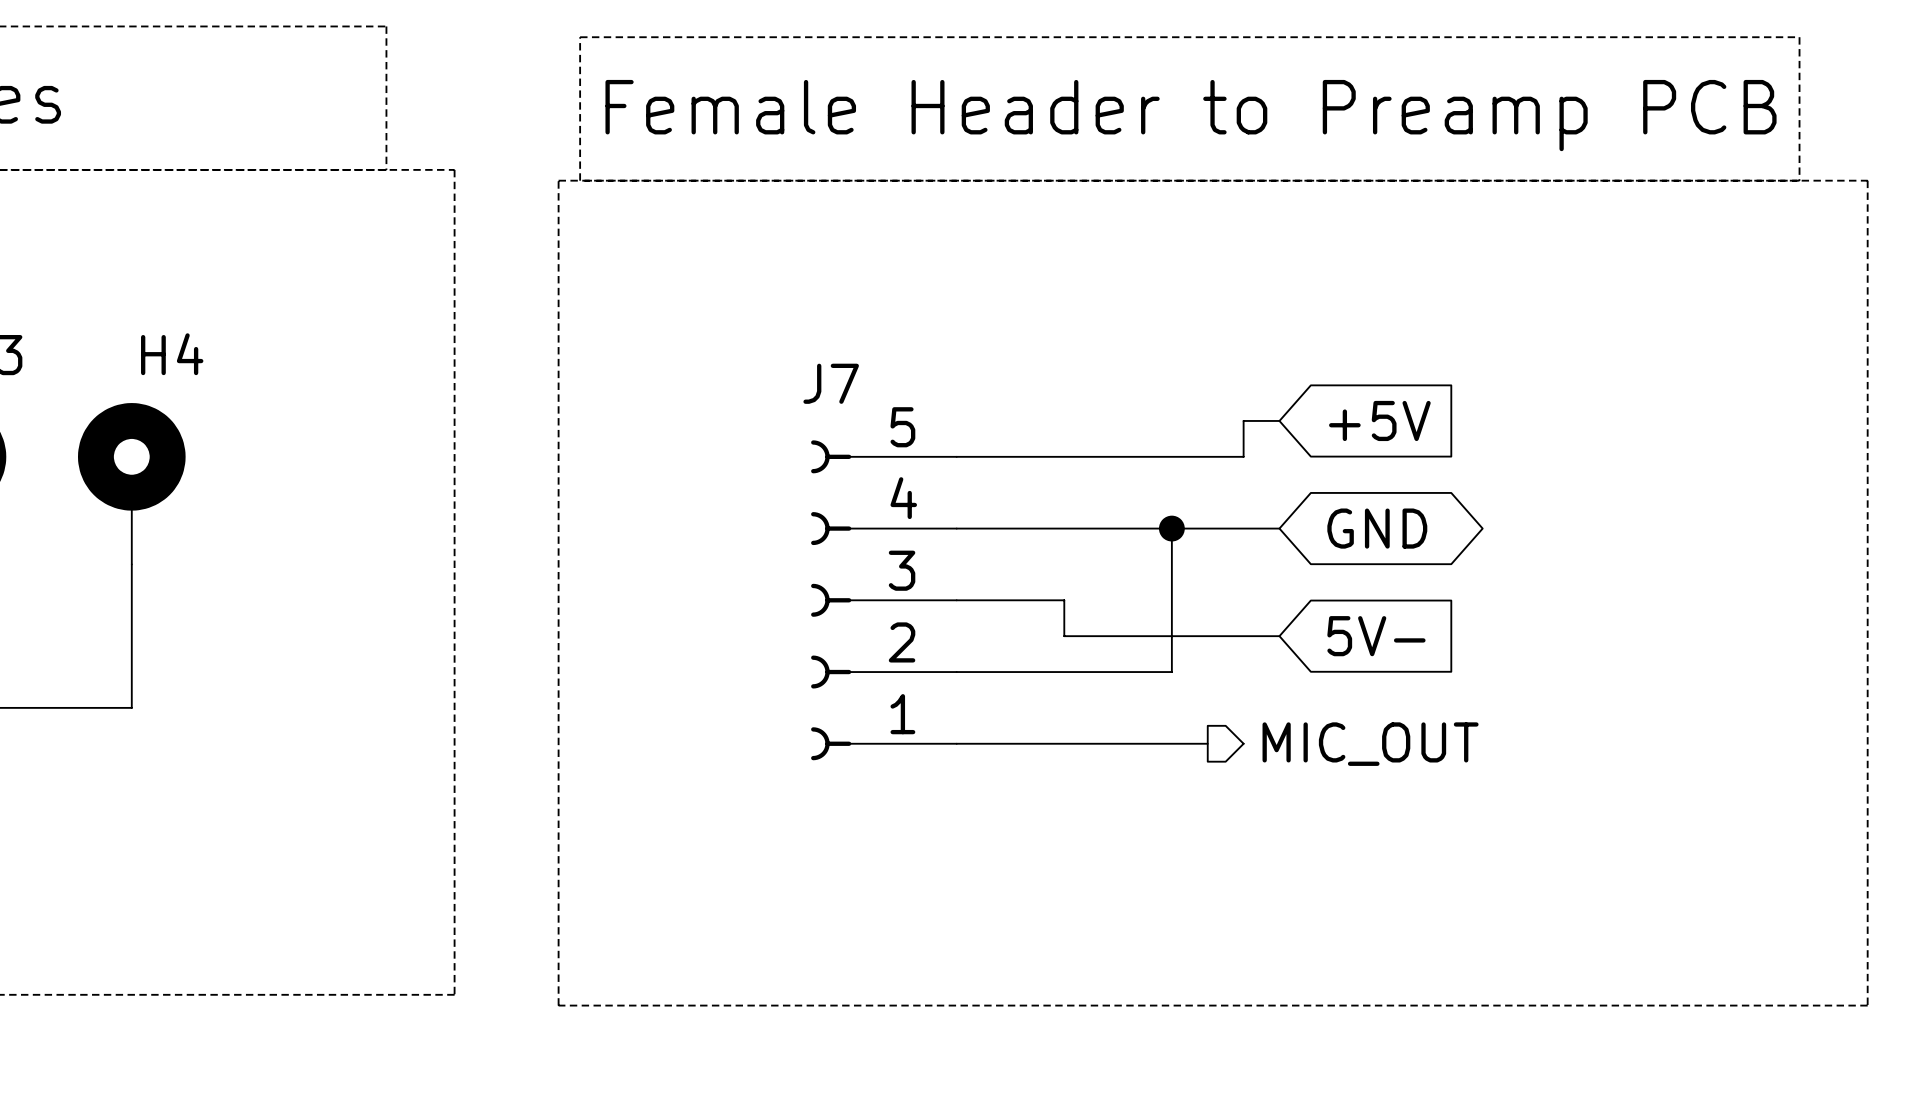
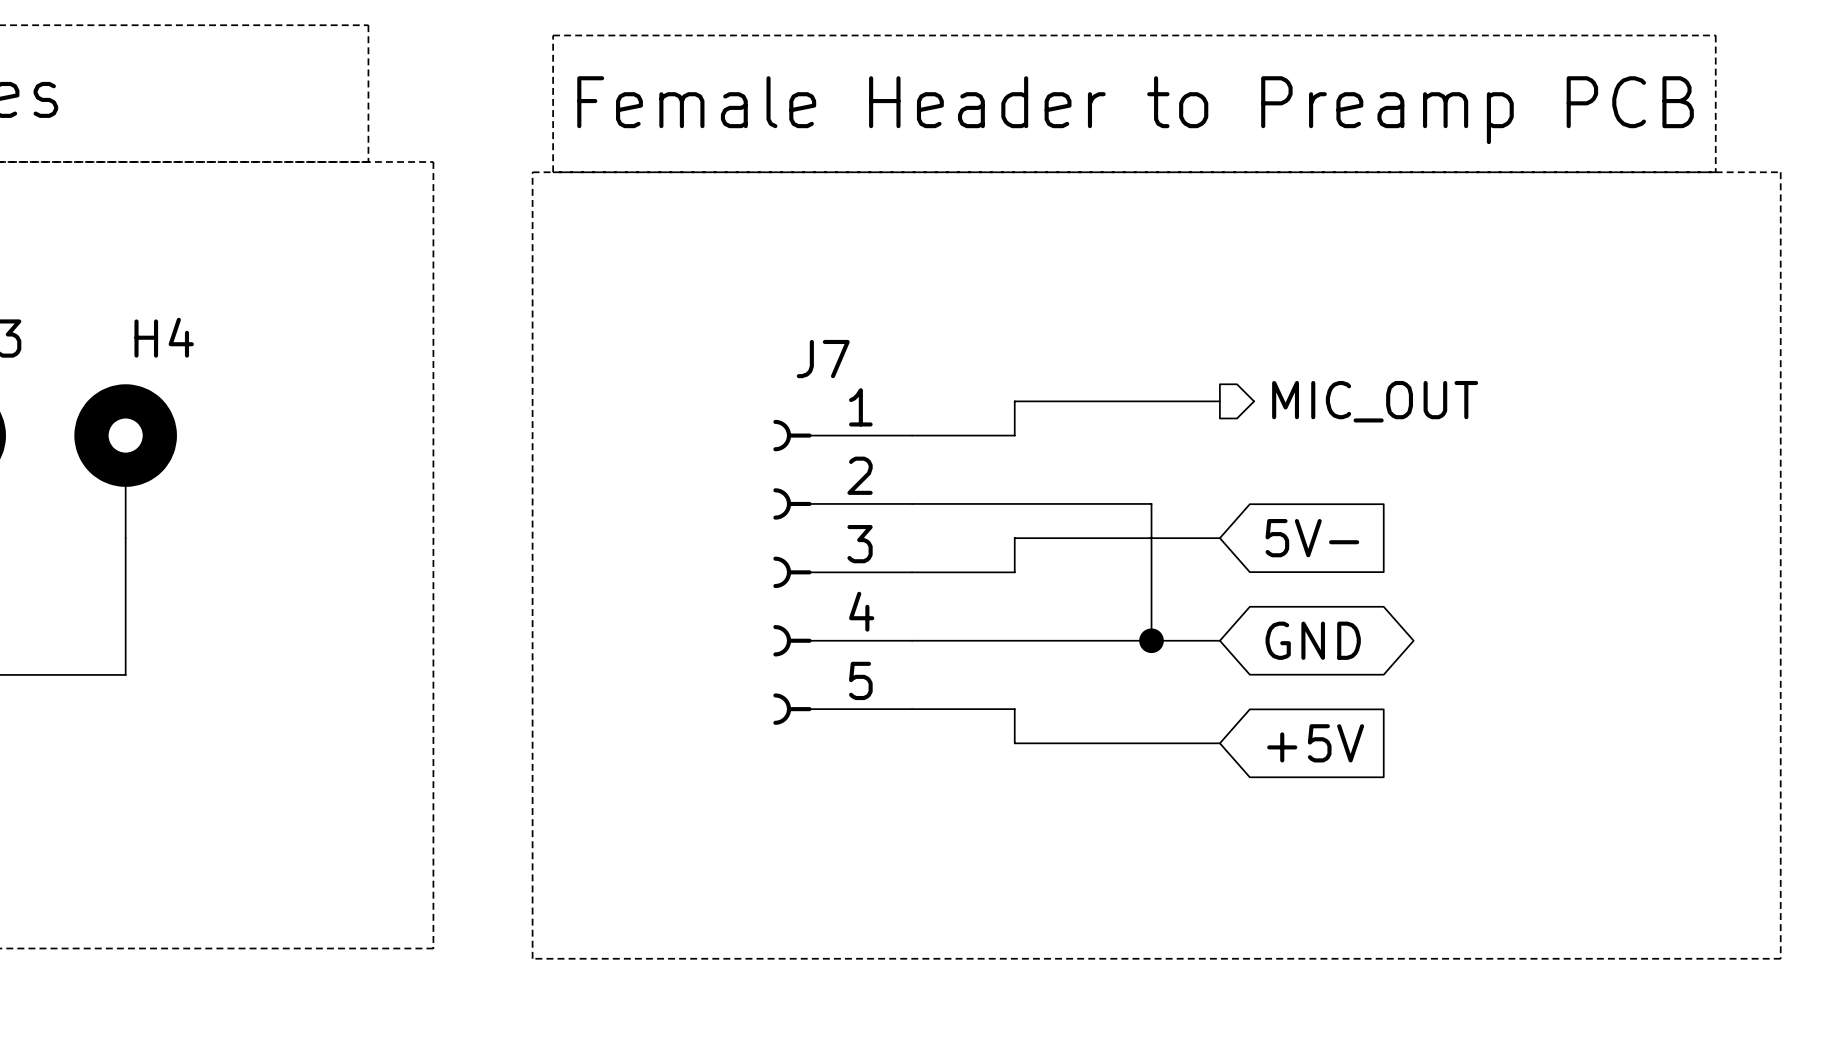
wire: (1243, 420) (1243, 456) (1064, 456) -> (1185, 401) (1014, 401) (1014, 435)
global label position: +5V (1379, 420) -> +5V (1315, 743)
wire: (1171, 528) (1171, 672) -> (1219, 640) (1117, 640)
junction position: (1171, 528) -> (1151, 640)
wire: (1207, 528) (1279, 528) -> (1151, 503) (1151, 640)
global label position: GND (1377, 528) -> GND (1313, 640)
J7 flip: as is (831, 600) -> up-down (792, 572)
wire: (1064, 600) (1064, 636) (1279, 636) -> (1014, 572) (1014, 538) (1219, 538)
global label position: 5V- (1376, 636) -> 5V- (1312, 538)
wire: (1064, 743) (1207, 743) -> (1014, 709) (1014, 743) (1219, 743)
hierarchical label position: MIC_OUT (1370, 744) -> MIC_OUT (1375, 401)

